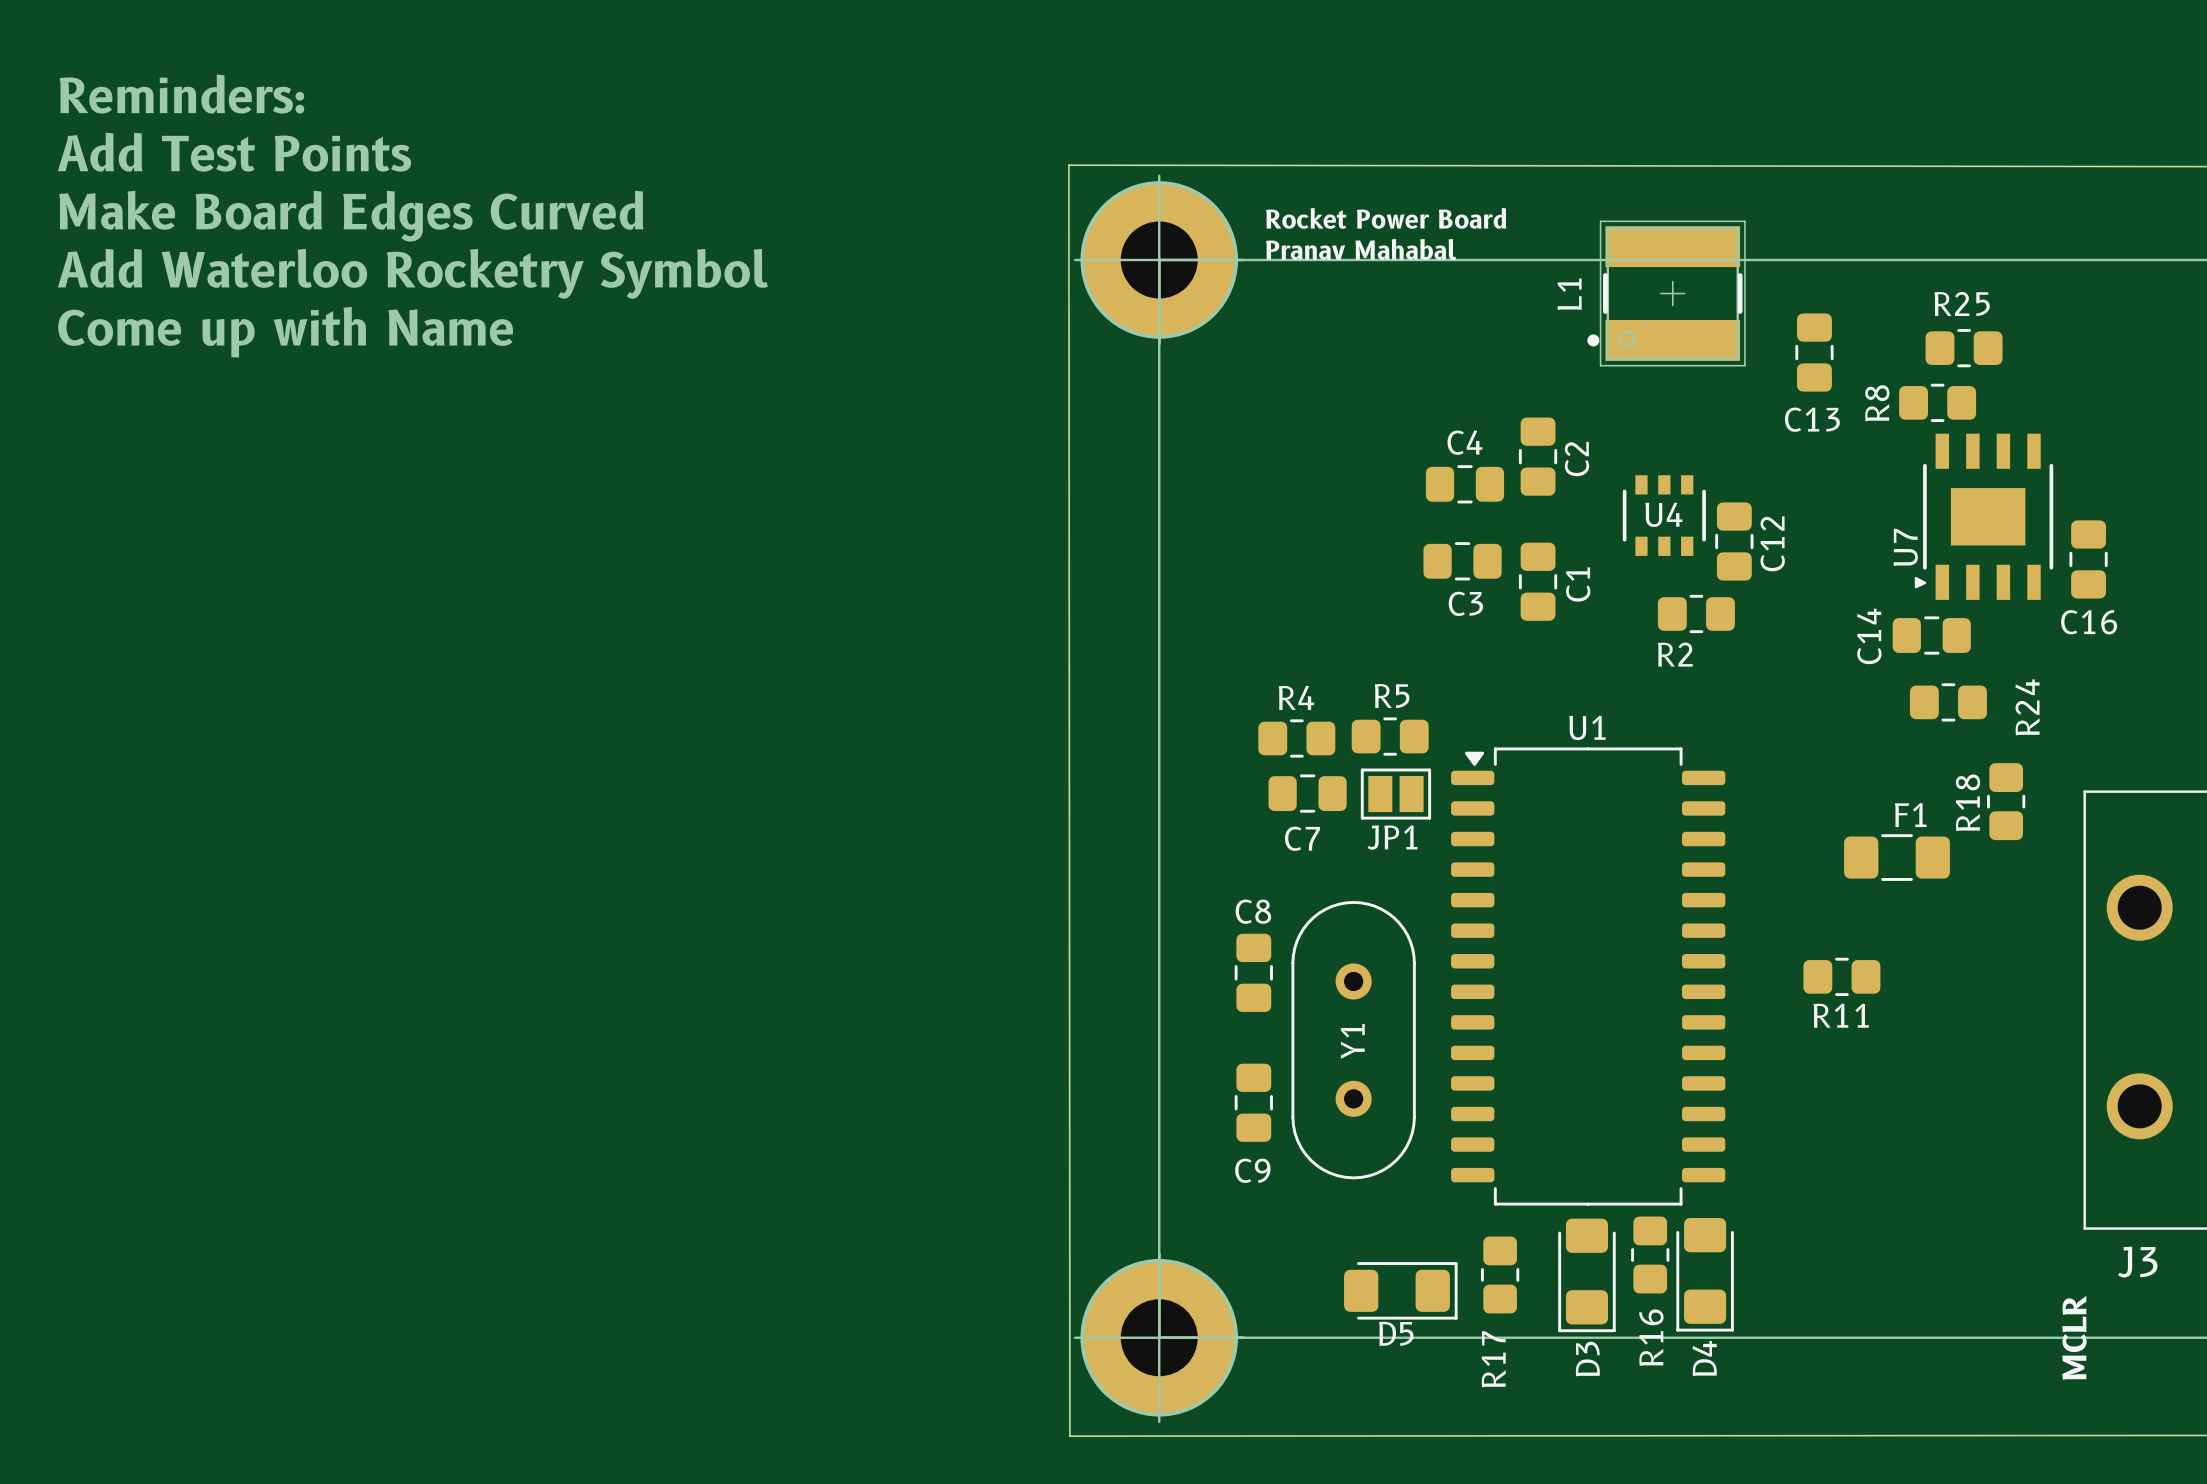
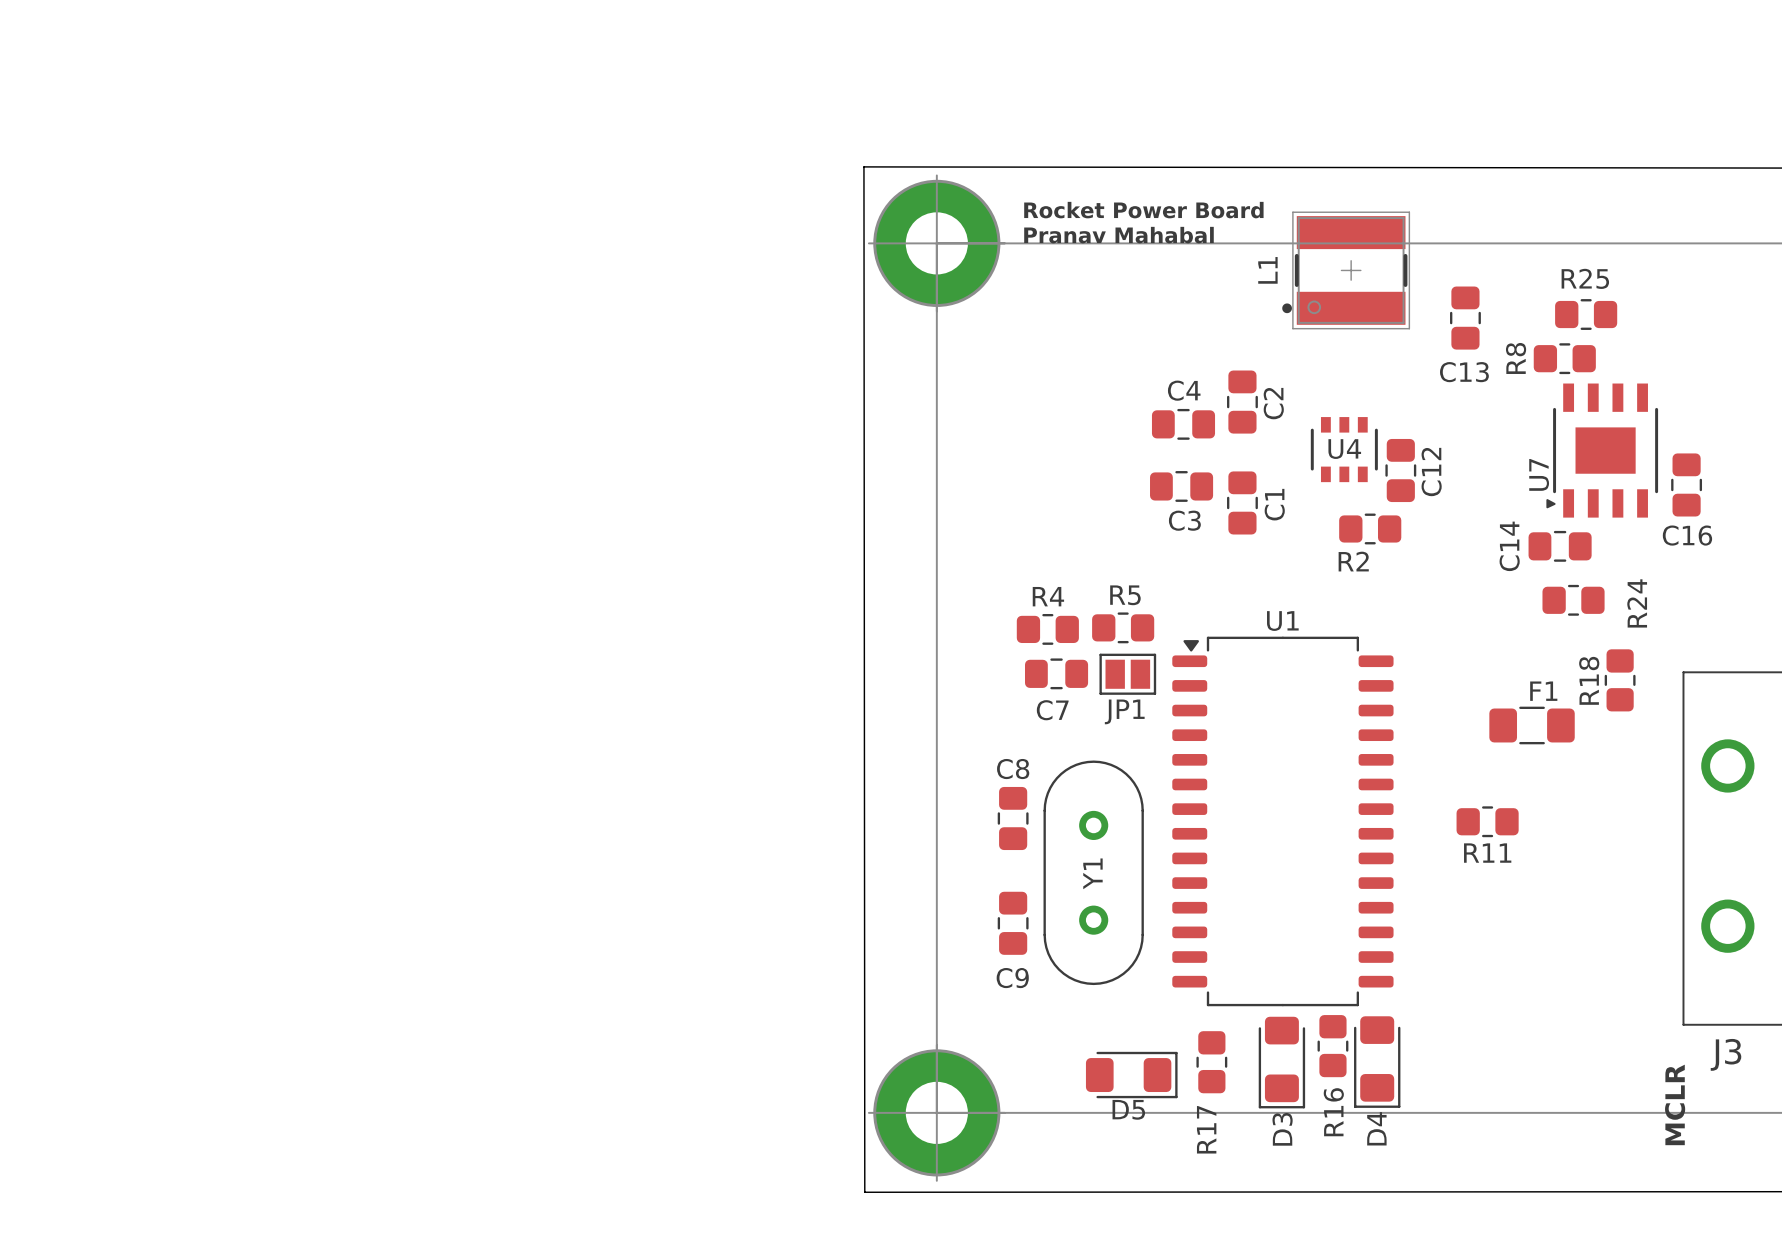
text: Reminders: (181, 94) -> none
text: Add Test Points (234, 152) -> none
text: Make Board Edges Curved (351, 216) -> none
text: Add Waterloo Rocketry Symbol (412, 273) -> none
text: Come up with Name (285, 332) -> none

